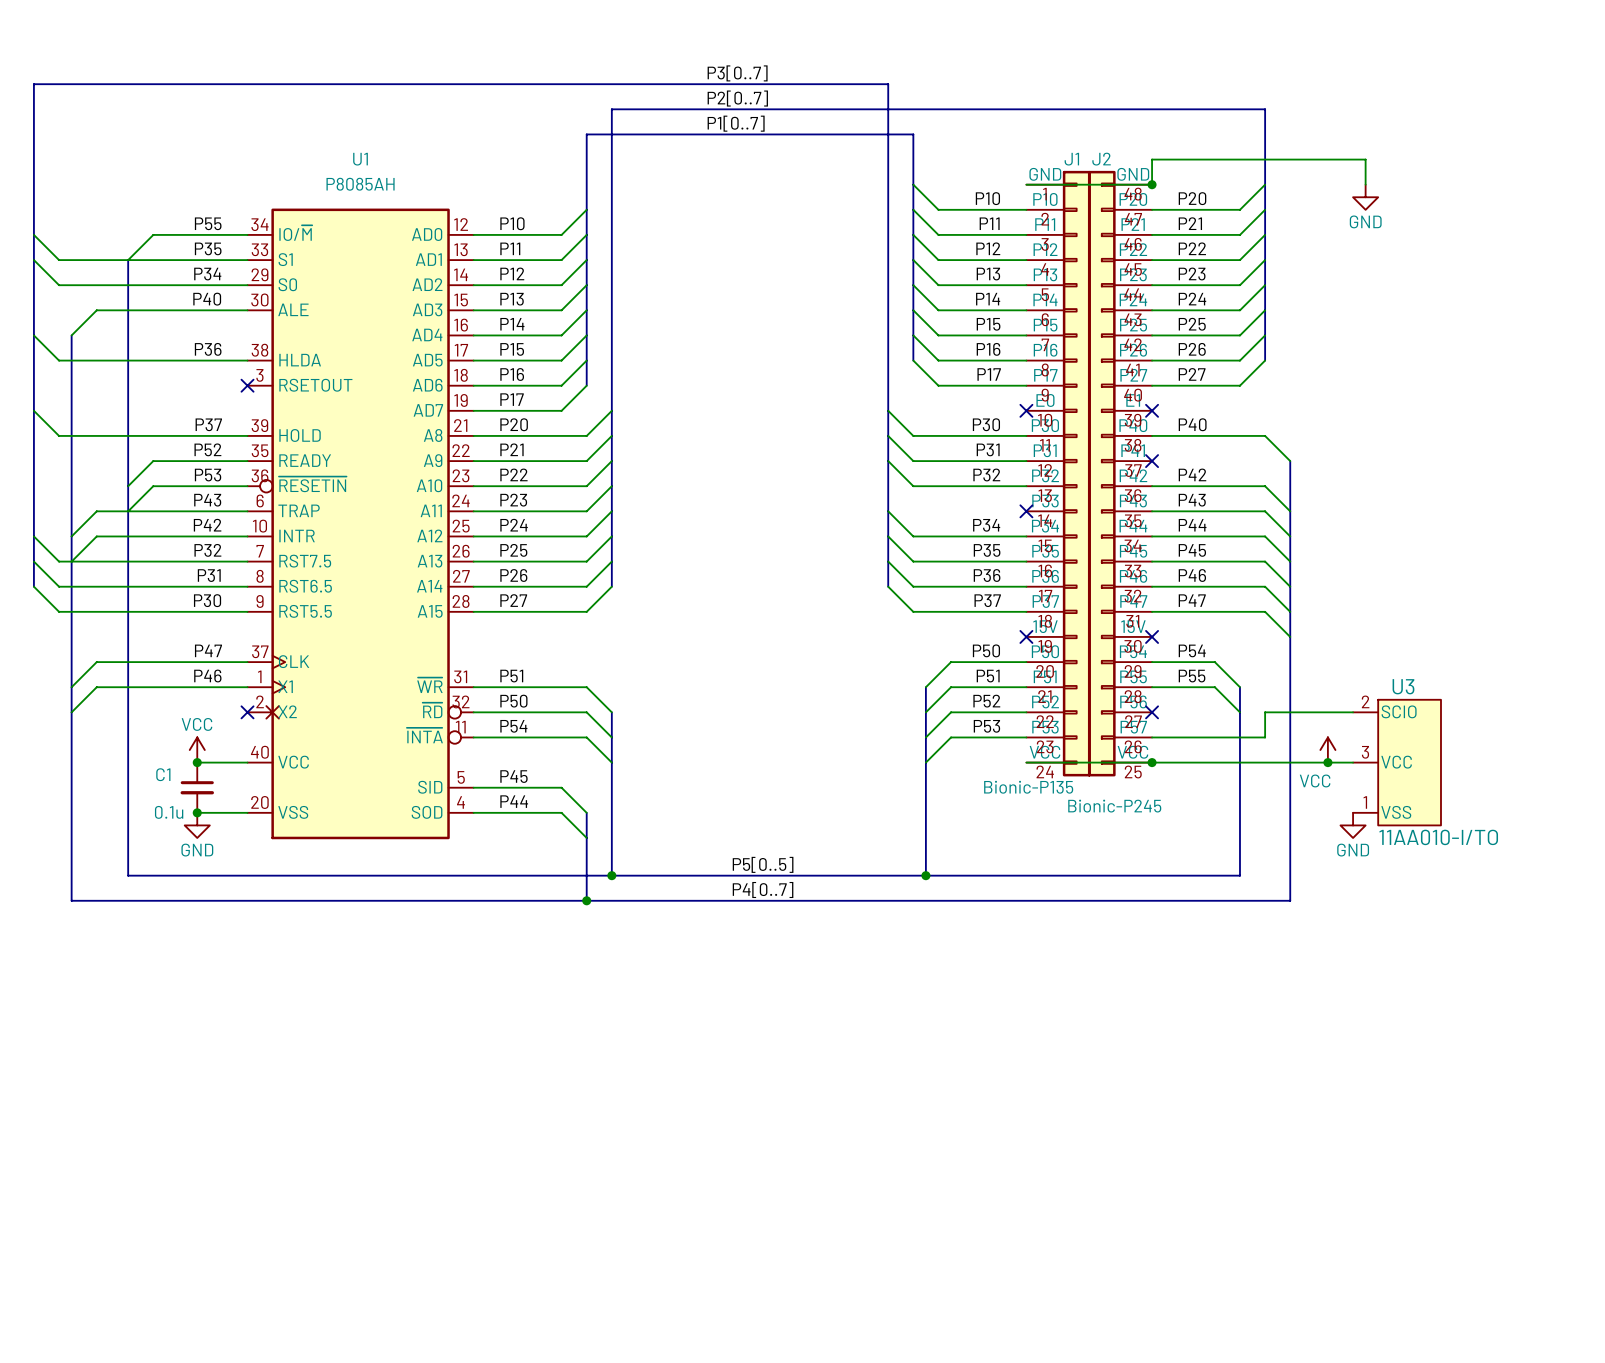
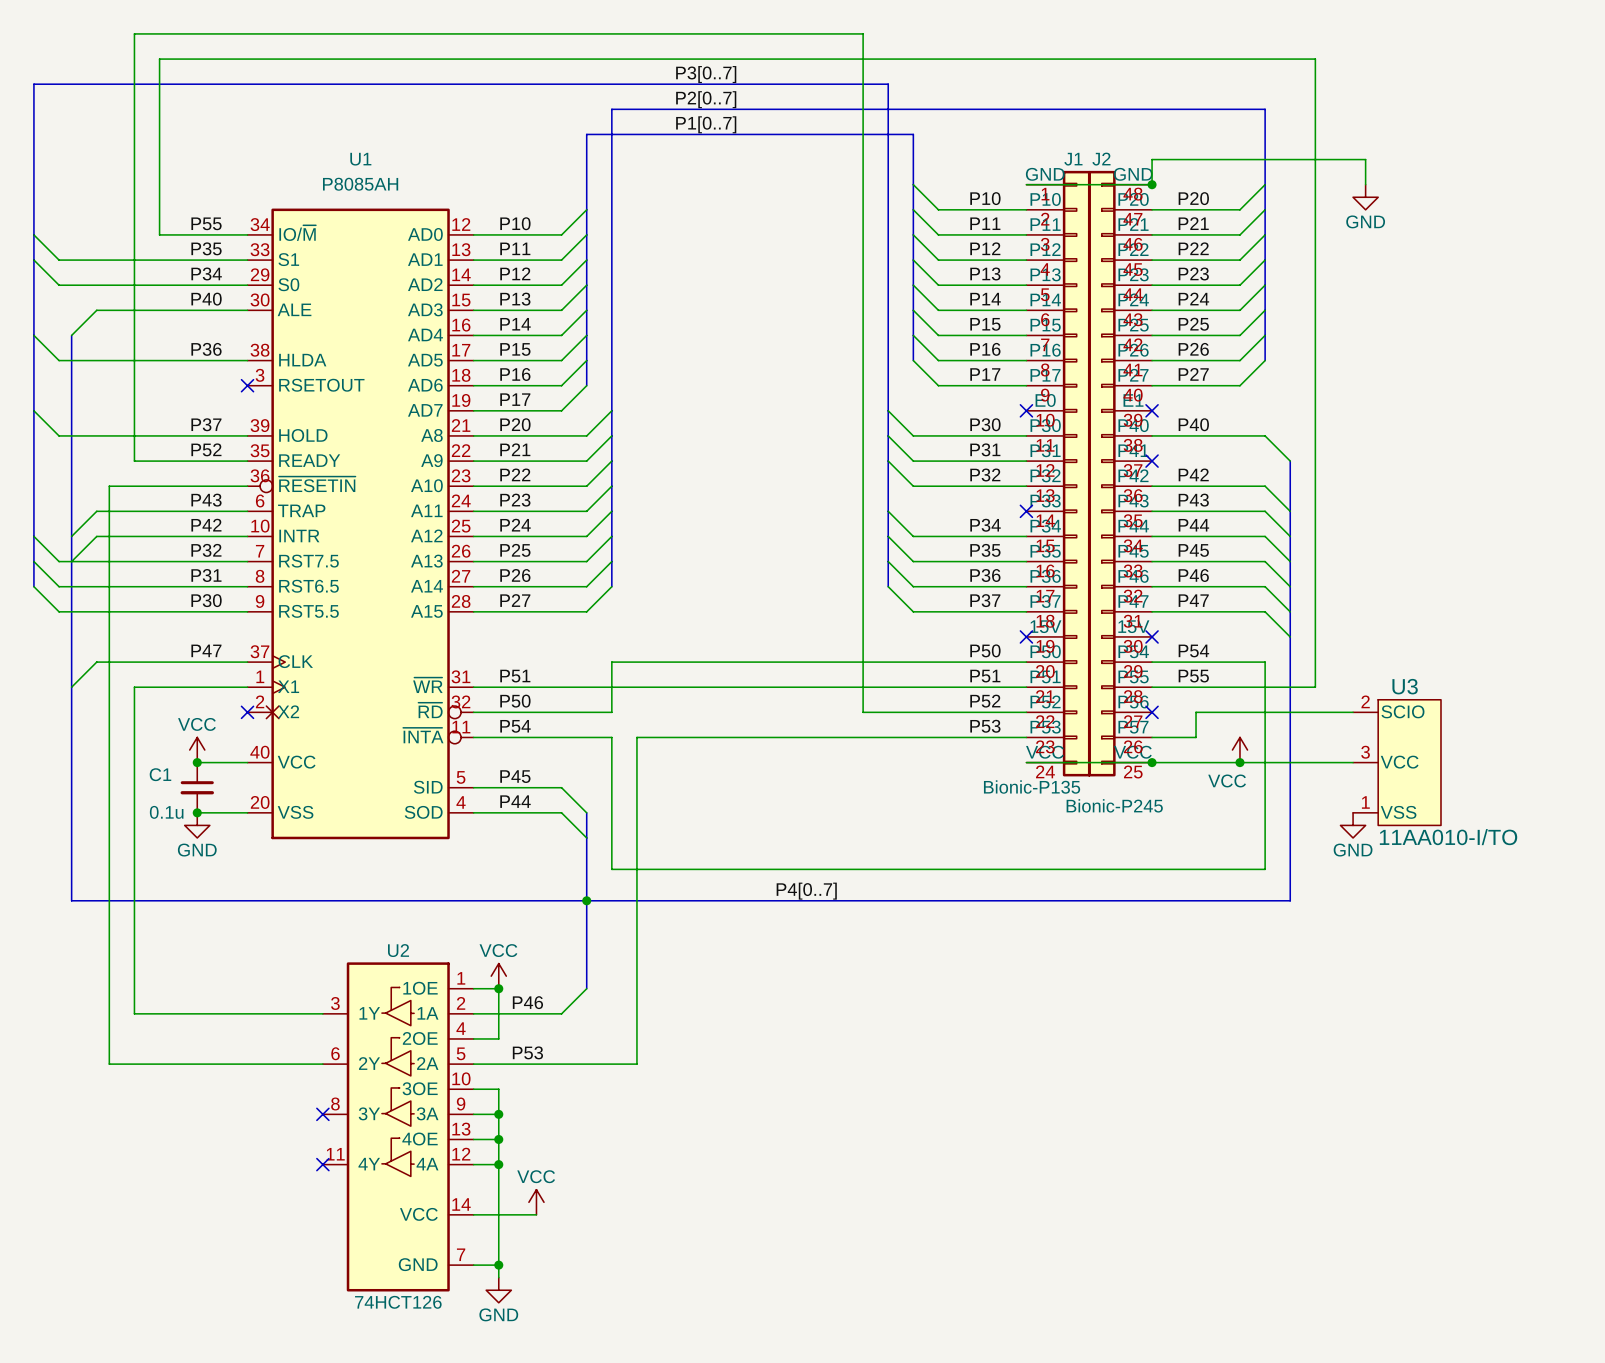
label position: P3[0..7] (737, 73) -> P3[0..7] (706, 74)
label position: P2[0..7] (737, 98) -> P2[0..7] (706, 99)
label position: P1[0..7] (736, 123) -> P1[0..7] (706, 124)
wire: (159, 234) (153, 234) (128, 260) -> (159, 234) (159, 59) (1315, 59) (1315, 687) (1214, 687)
bus: (128, 260) (128, 875) (1239, 875) (1239, 687) -> none
wire: (153, 461) (128, 486) -> none
label: P53 (208, 475) -> none
wire: (153, 486) (128, 511) -> (153, 486) (109, 486) (109, 1064) (322, 1064)
wire: (951, 662) (925, 687) -> (951, 662) (611, 662) (611, 712) (586, 712)
wire: (1214, 662) (1239, 687) -> (1214, 662) (1265, 662) (1265, 712) (1196, 712) (1196, 737)
label: P46 (207, 676) -> none
wire: (134, 687) (96, 687) (71, 712) -> (134, 687) (134, 1013) (322, 1013)
wire: (586, 687) (611, 712) -> (586, 687) (951, 687)
bus: (925, 687) (925, 875) -> none
wire: (951, 687) (925, 712) -> none
wire: (1214, 687) (1239, 712) -> none
wire: (586, 712) (611, 737) -> none
bus: (611, 712) (611, 875) -> none
wire: (951, 712) (925, 737) -> (951, 712) (863, 712) (863, 33) (134, 33) (134, 461) (153, 461)
wire: (586, 737) (611, 762) -> none
wire: (951, 737) (925, 762) -> (951, 737) (636, 737) (636, 1064) (473, 1064)
wire: (1196, 737) (1265, 737) -> (586, 737) (611, 737) (611, 869) (1265, 869) (1265, 737)
power symbol position: VCC (1327, 750) -> VCC (1239, 750)
junction: none -> (1239, 762)
junction: (1327, 762) -> none
label: P5[0..5] (763, 864) -> none
junction: (611, 875) -> none
junction: (925, 875) -> none
label position: P4[0..7] (763, 889) -> P4[0..7] (806, 891)
bus: none -> (586, 900) (586, 988)
power symbol: none -> VCC (498, 976)
wire: none -> (473, 988) (498, 988) (498, 1038) (473, 1038)
junction: none -> (498, 988)
wire: none -> (586, 988) (561, 1013) (473, 1013)
label: none -> P46 (527, 1002)
label: none -> P53 (527, 1052)
wire: none -> (473, 1089) (498, 1089) (498, 1277)
no-connect mark: none -> (322, 1114)
wire: none -> (473, 1114) (498, 1114)
junction: none -> (498, 1114)
U2: none -> 74HCT126 (398, 1126)
wire: none -> (473, 1139) (498, 1139)
junction: none -> (498, 1139)
no-connect mark: none -> (322, 1164)
wire: none -> (473, 1164) (498, 1164)
junction: none -> (498, 1164)
power symbol: none -> VCC (536, 1202)
wire: none -> (473, 1214) (536, 1214)
wire: none -> (473, 1265) (498, 1265)
junction: none -> (498, 1265)
power symbol: none -> GND (498, 1290)

